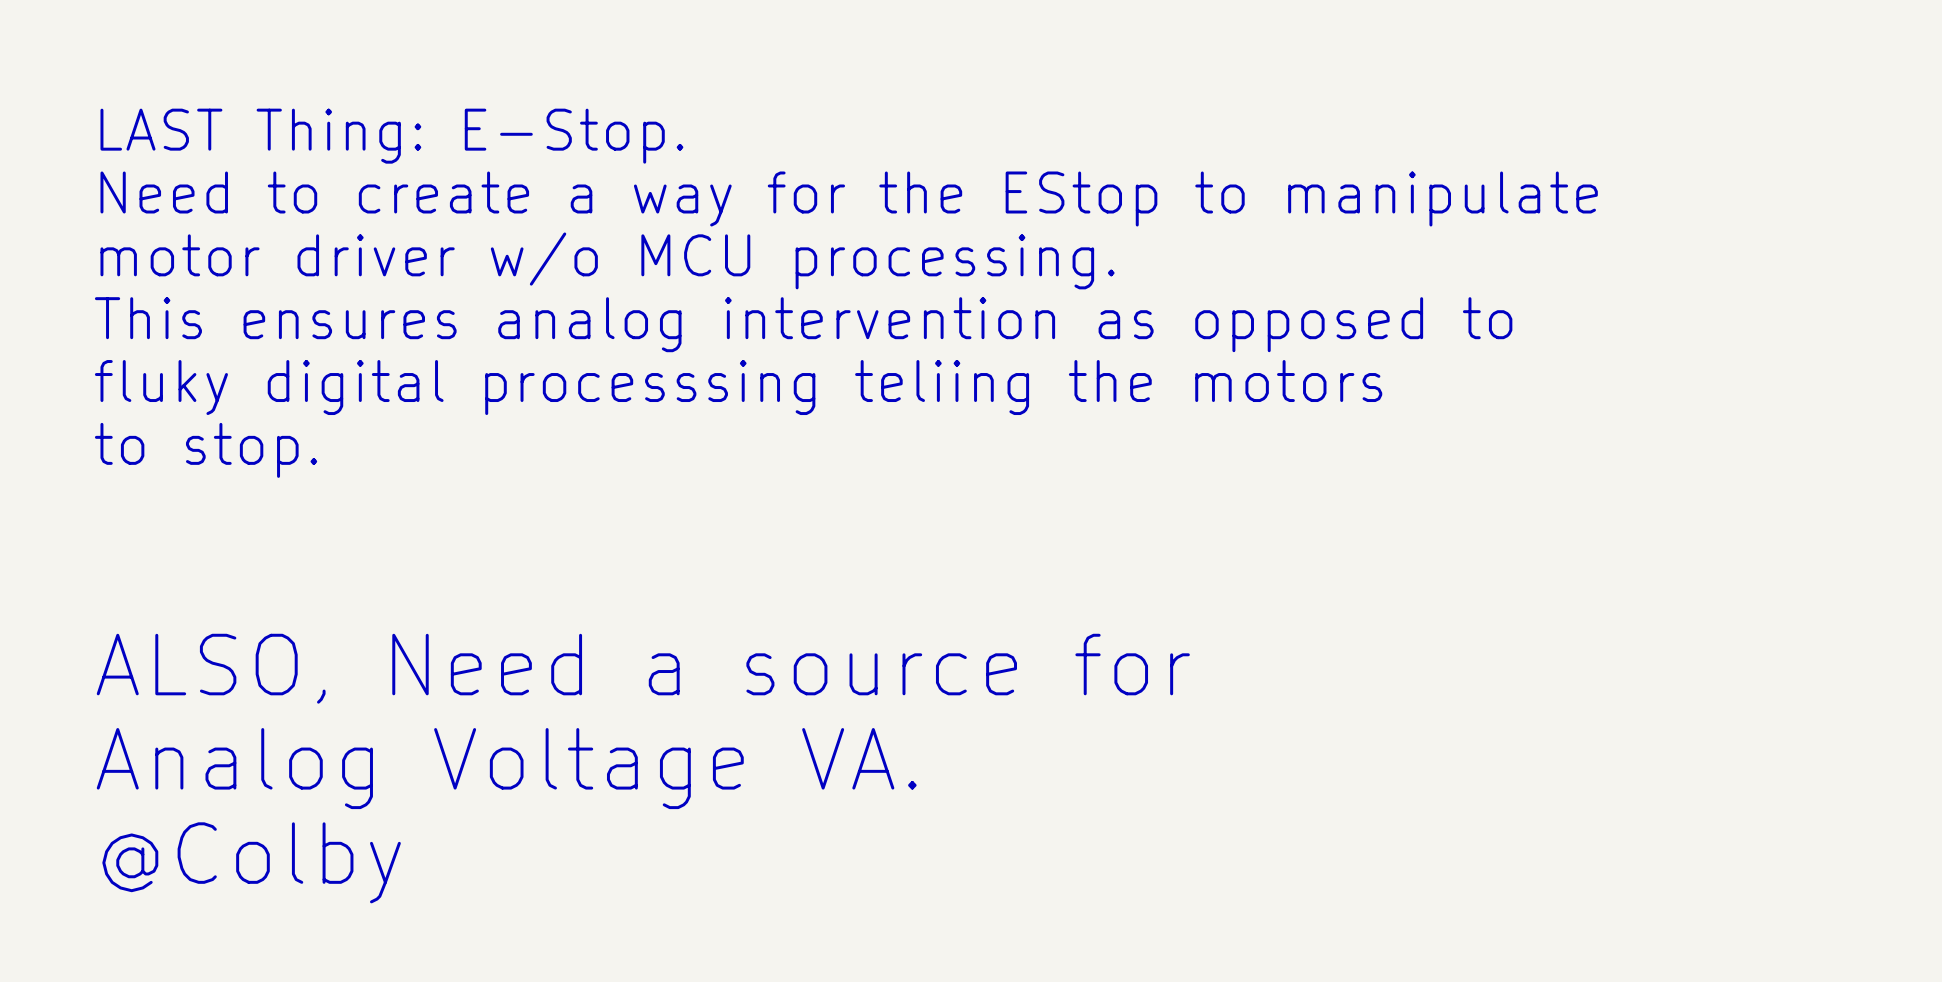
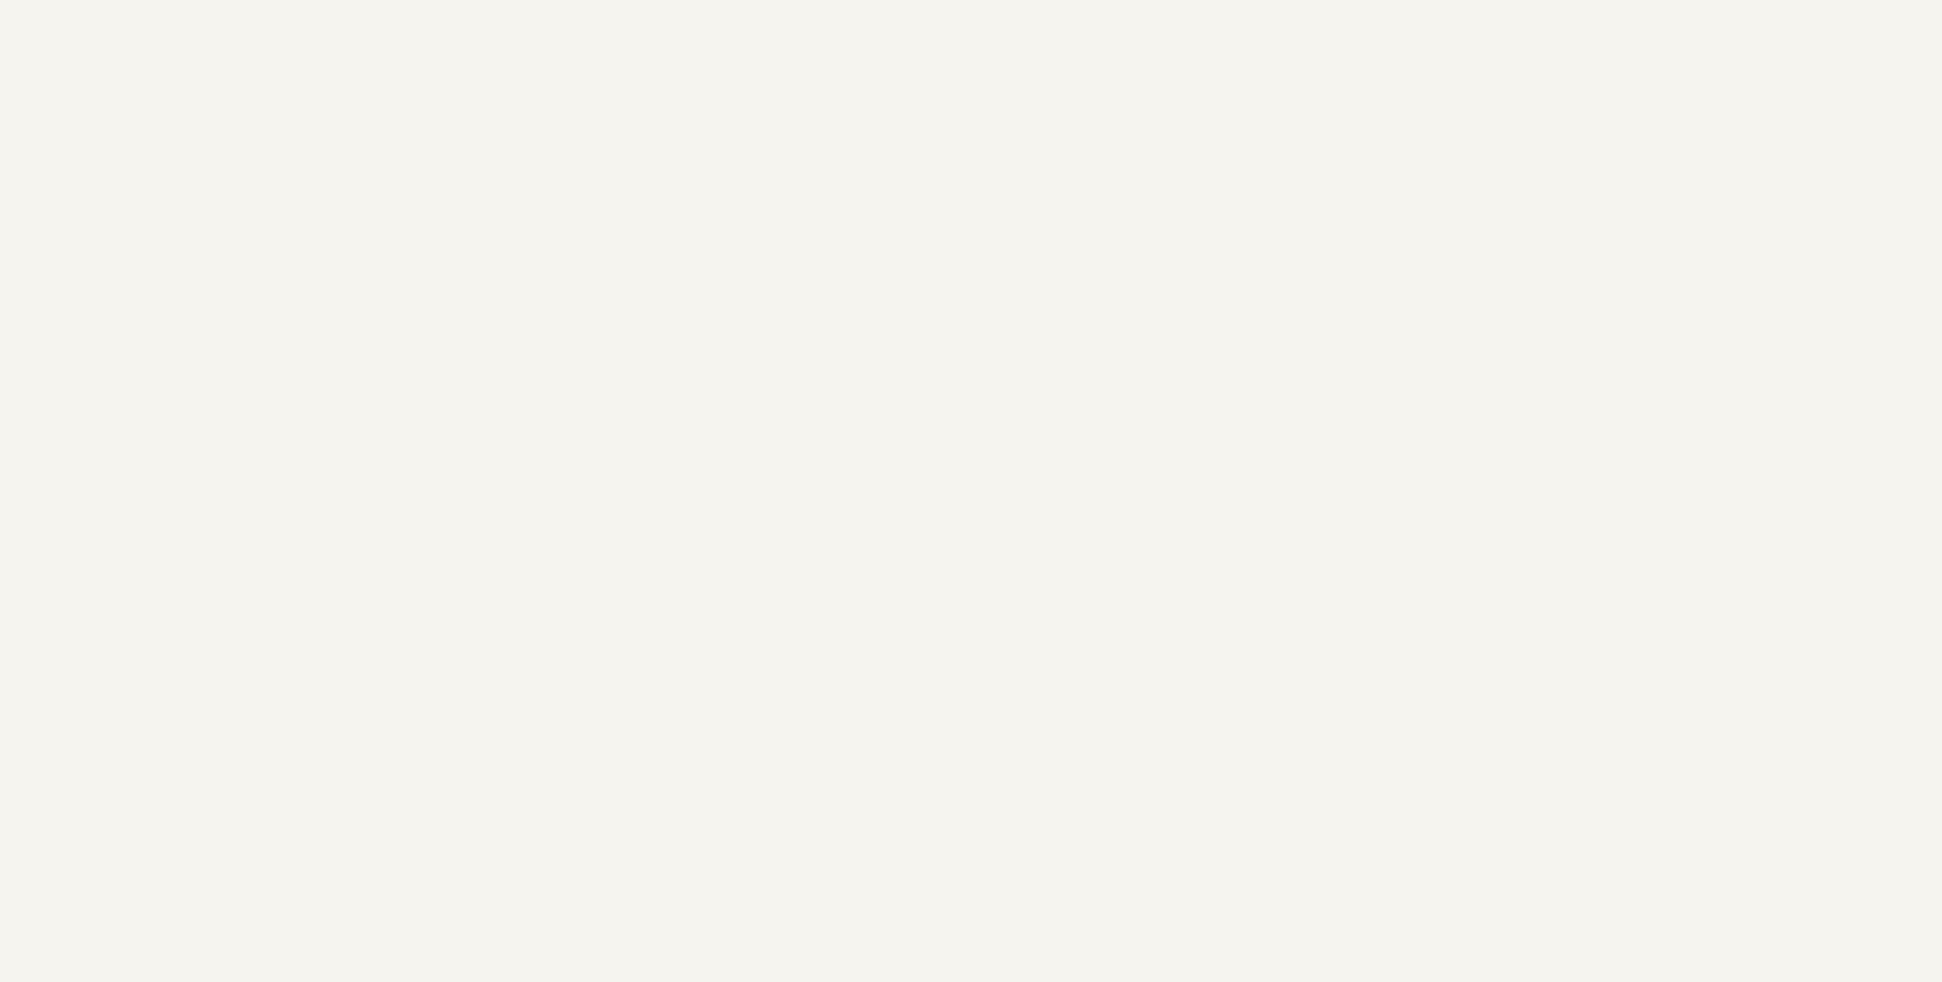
text: LAST Thing: E-Stop. (391, 136) -> none
text: Need to create a way for the EStop to manipulate (849, 198) -> none
text: motor driver w/o MCU processing. (607, 260) -> none
text: This ensures analog intervention as opposed to (803, 324) -> none
text: fluky digital processsing teliing the motors (738, 387) -> none
text: to stop. (206, 450) -> none
text: ALSO, Need a source for (643, 668) -> none
text: Analog Voltage VA. (506, 768) -> none
text: @Colby (251, 862) -> none

